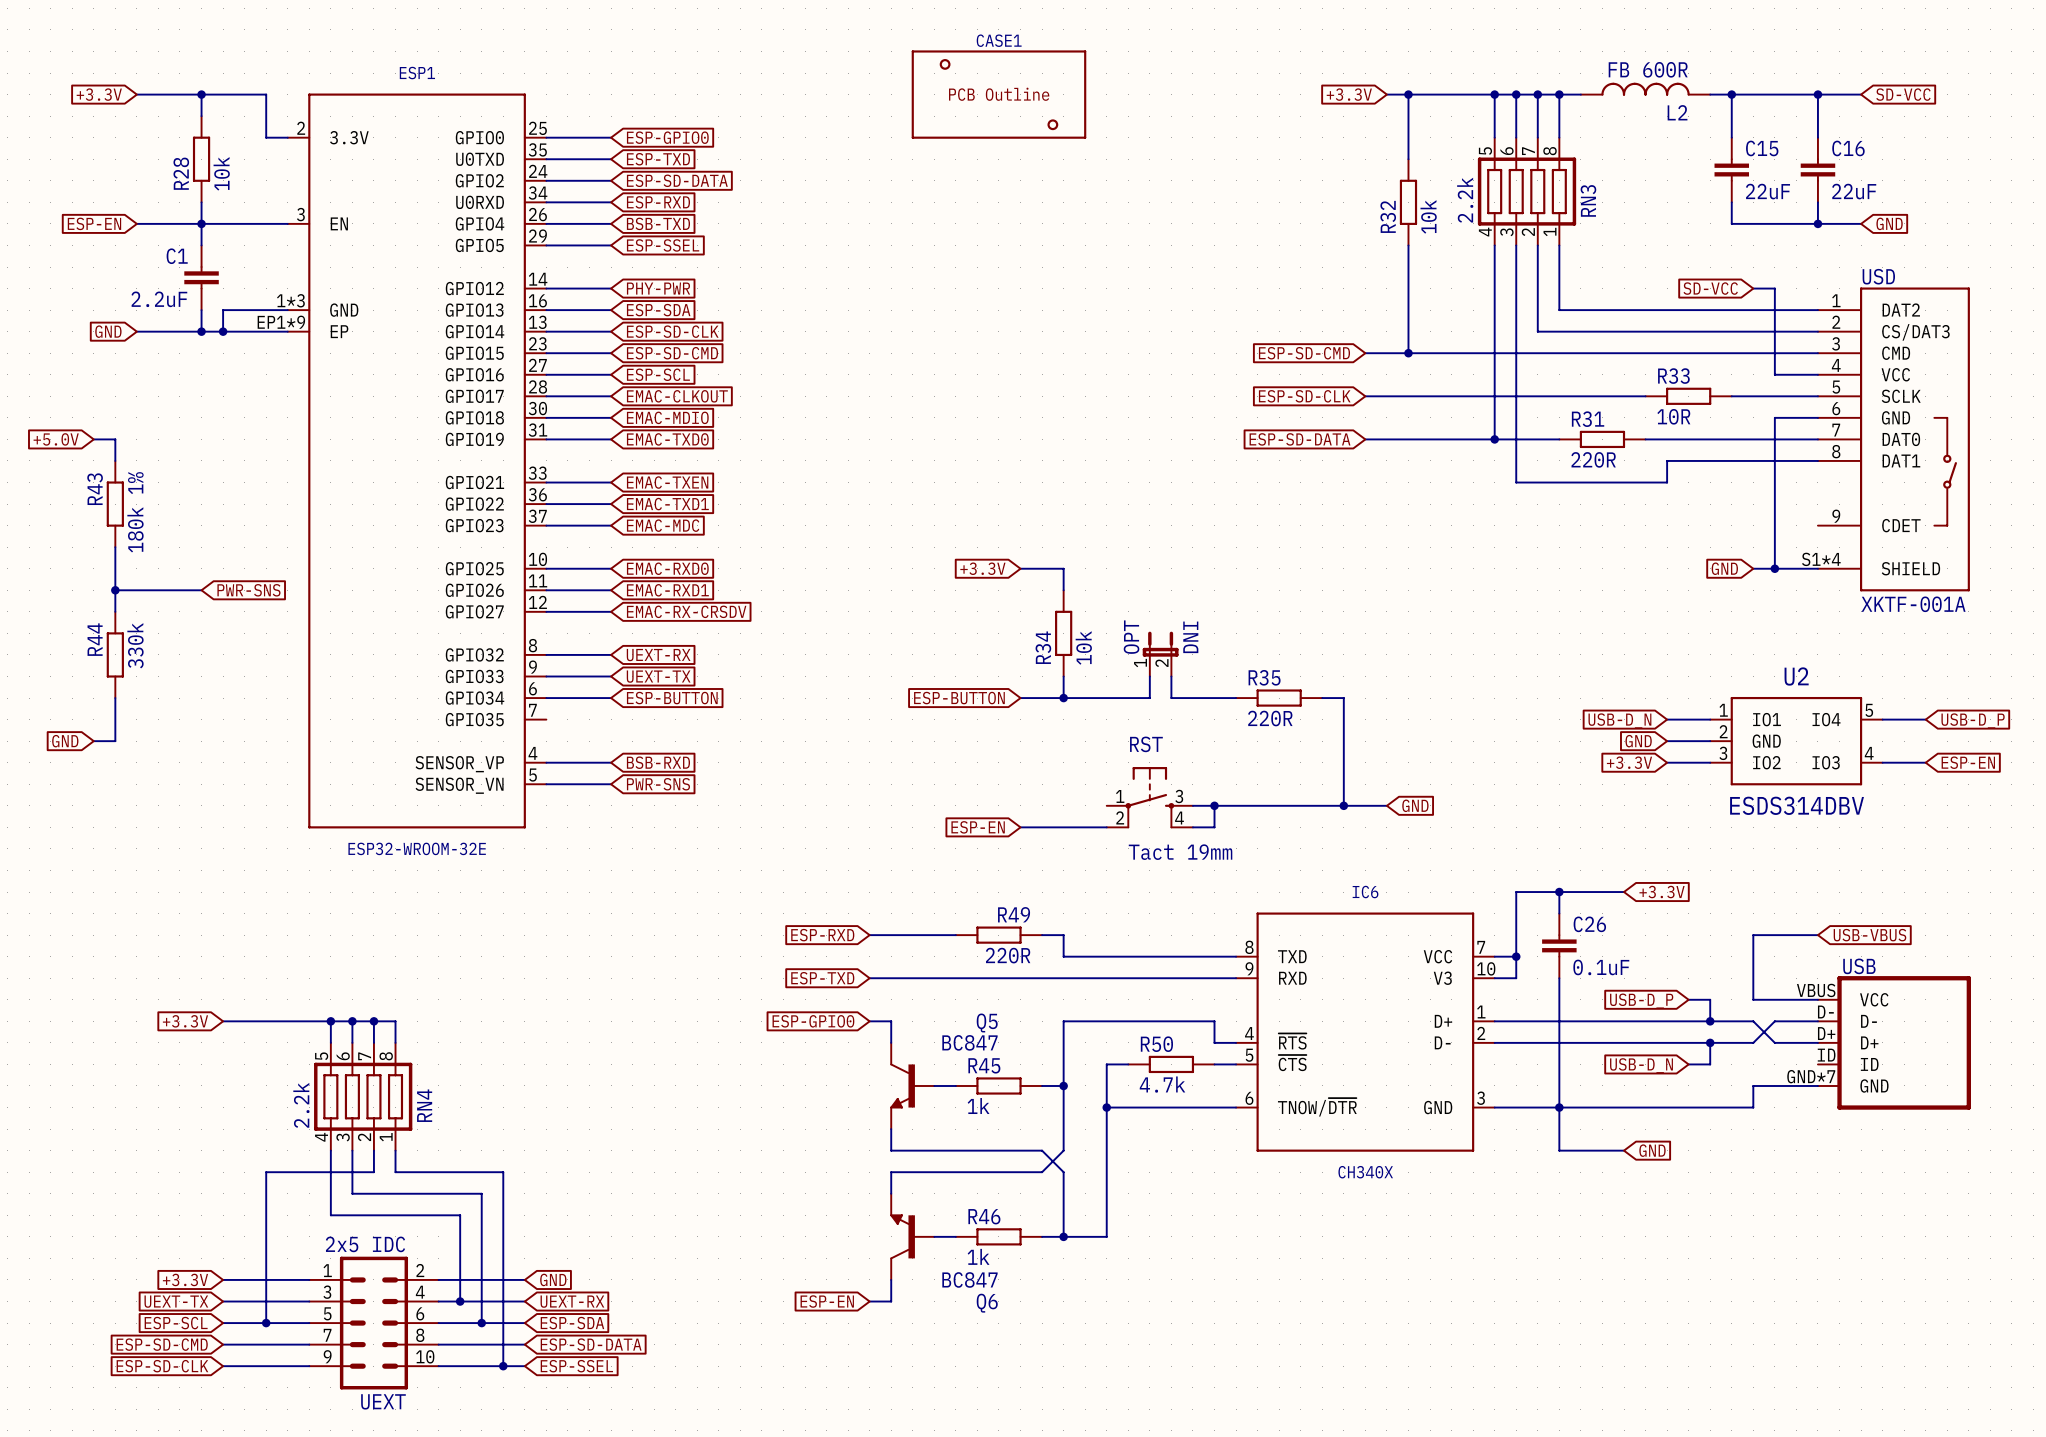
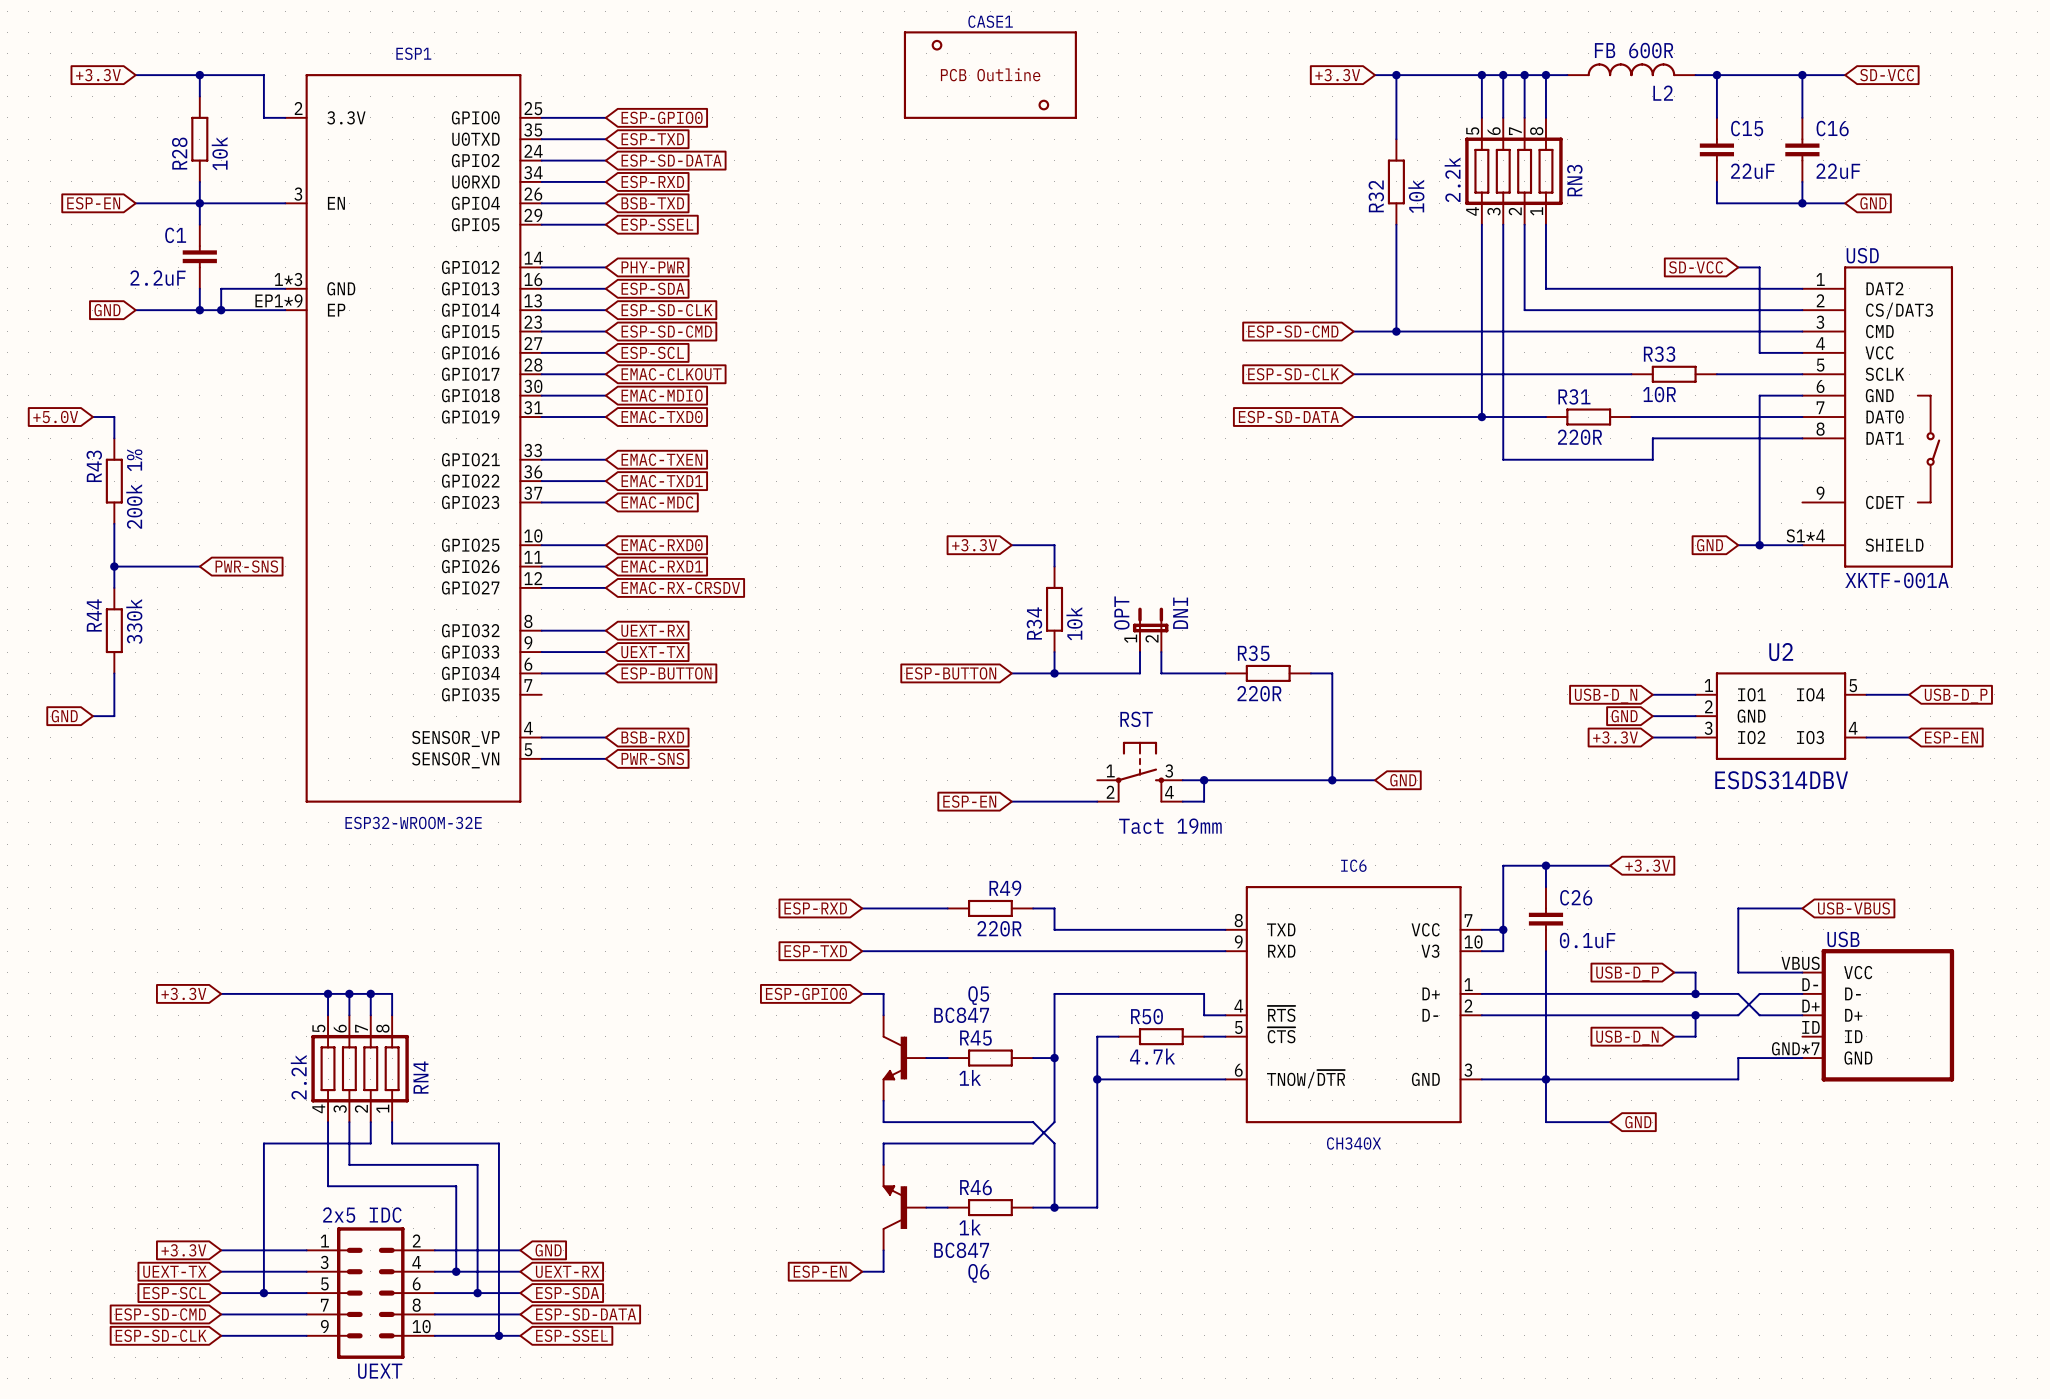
R43 value: 180k 1% (135, 512) -> 200k 1% (134, 489)

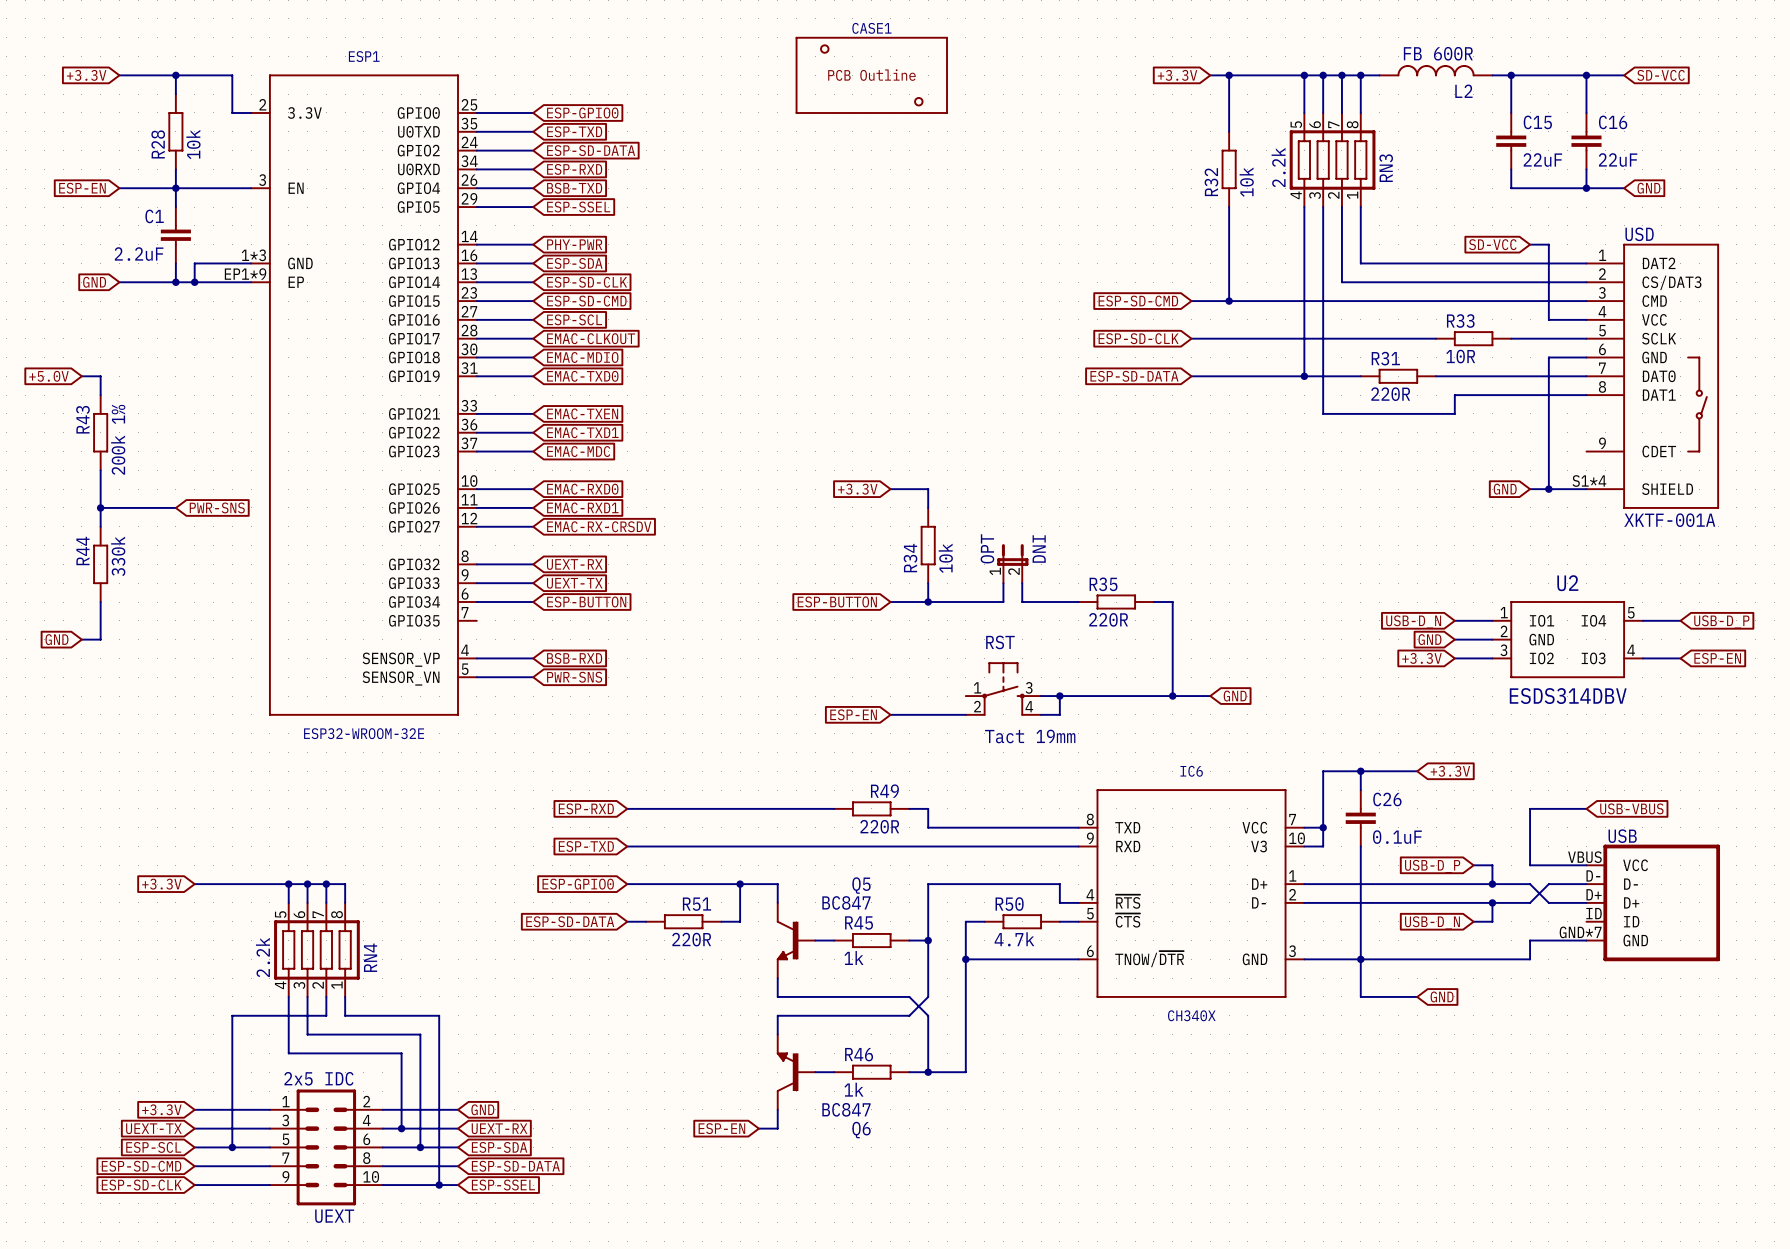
wire: none -> (627, 808) (758, 808)
global label position: ESP-RXD (815, 908) -> ESP-RXD (586, 808)
wire: none -> (627, 846) (758, 846)
global label position: ESP-TXD (815, 951) -> ESP-TXD (586, 846)
wire: none -> (627, 884) (758, 884)
global label position: ESP-GPIO0 (806, 993) -> ESP-GPIO0 (578, 884)
wire: none -> (740, 884) (740, 921) (721, 921)
junction: none -> (740, 884)
global label: none -> ESP-SD-DATA (570, 921)
wire: none -> (627, 921) (646, 921)
R51: none -> 220R (683, 921)

